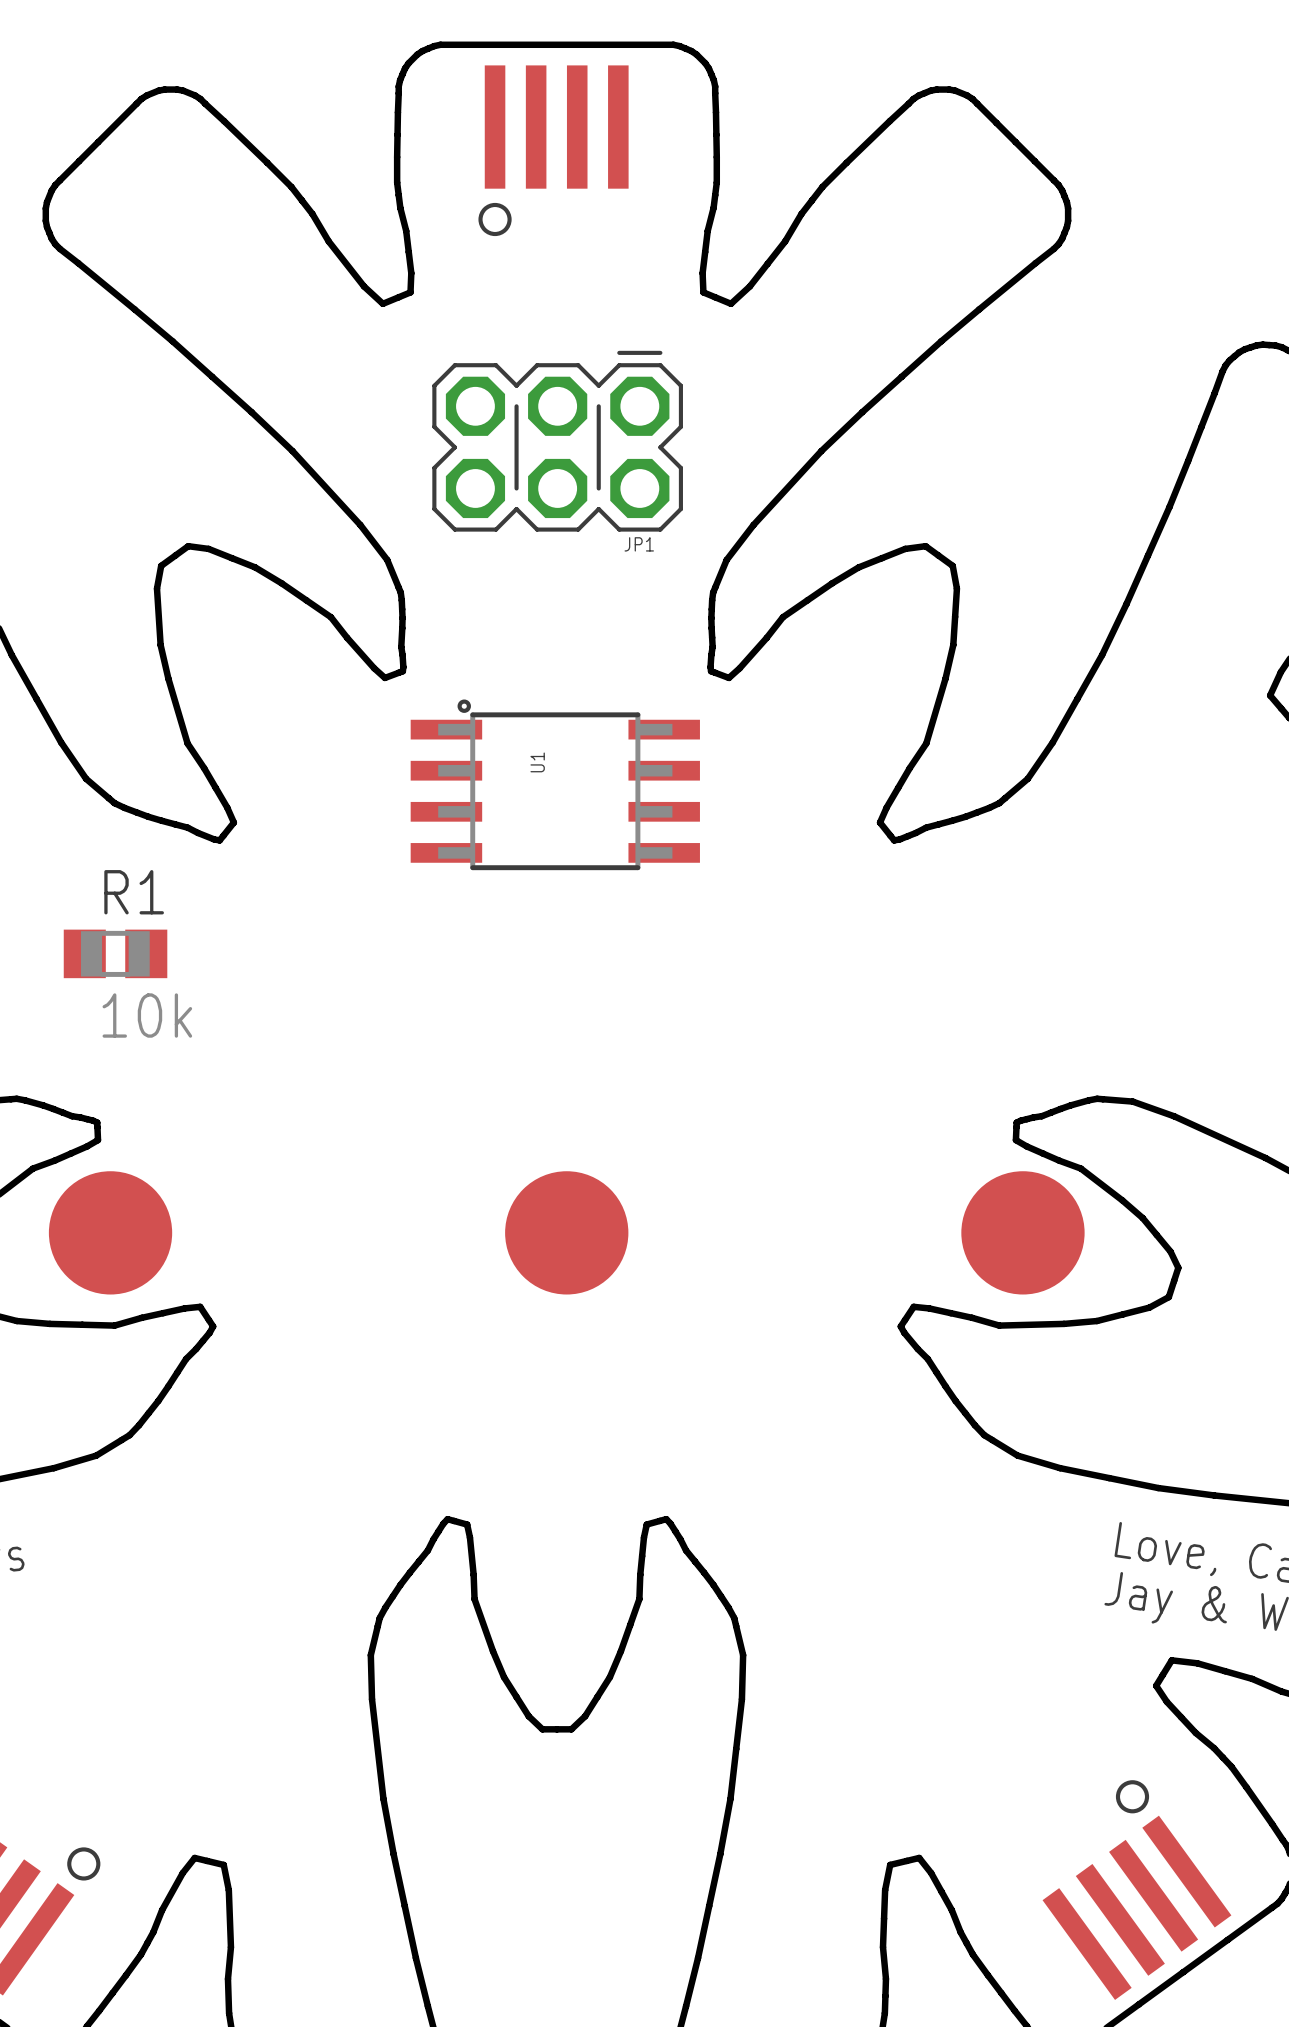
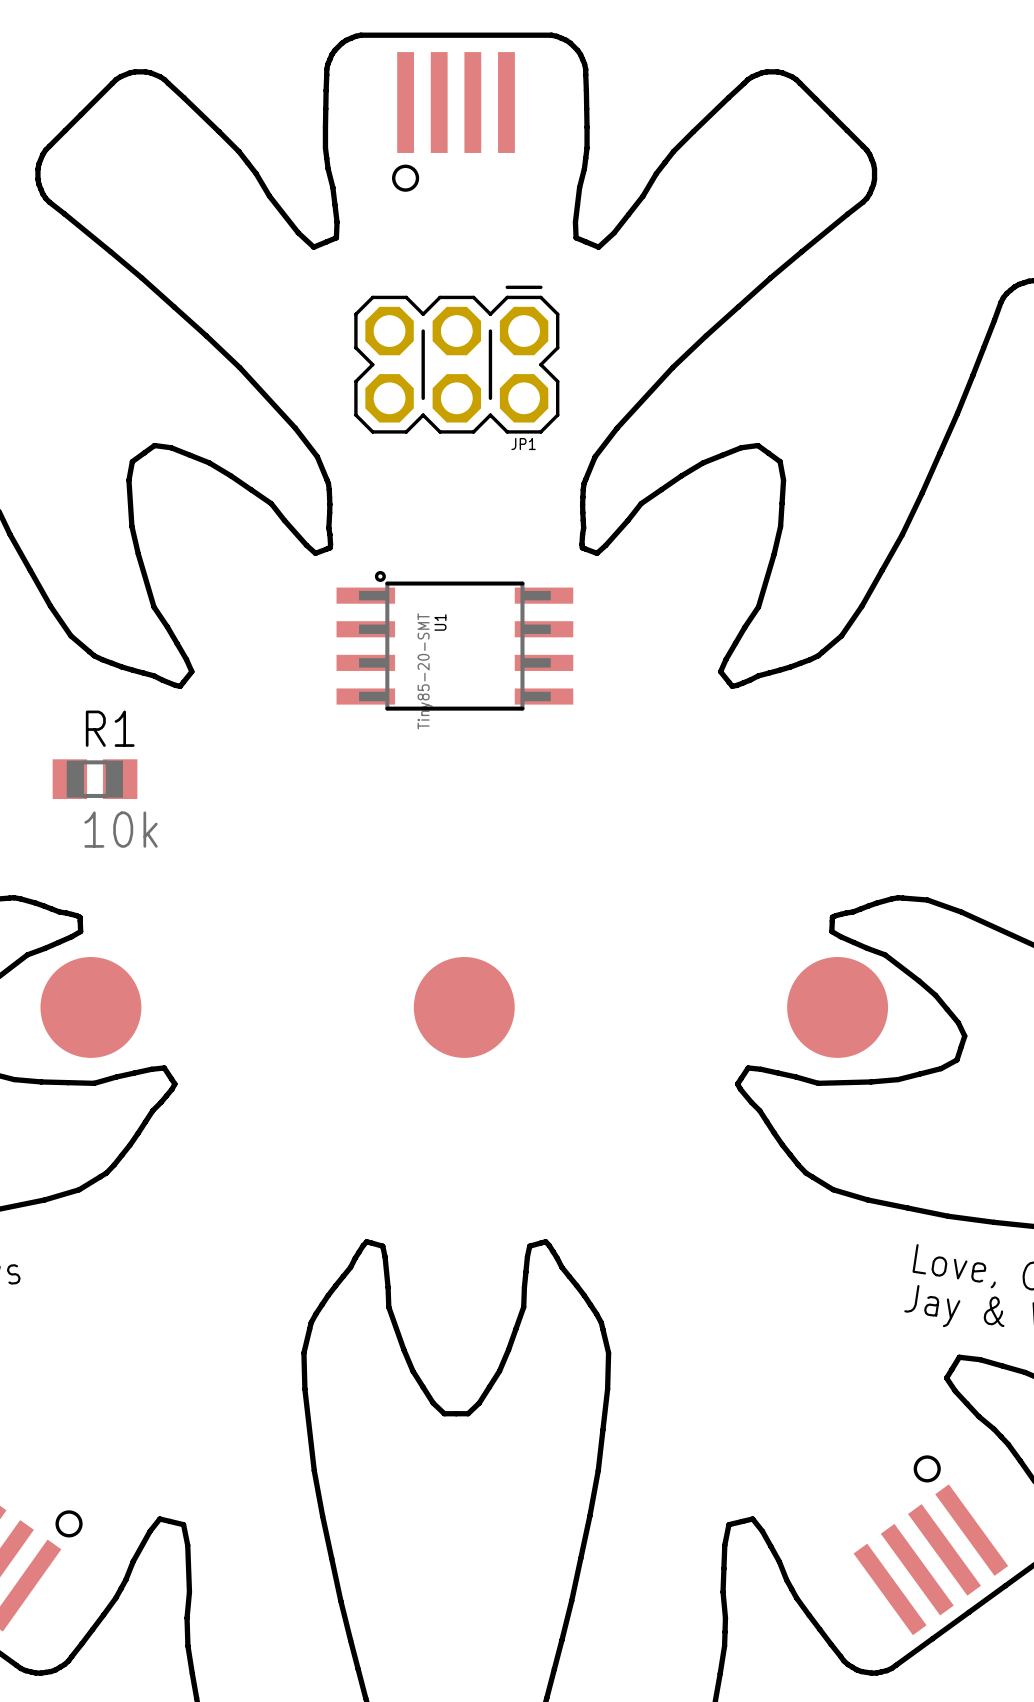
U1 value: none -> Tiny85-20-SMT (425, 671)

